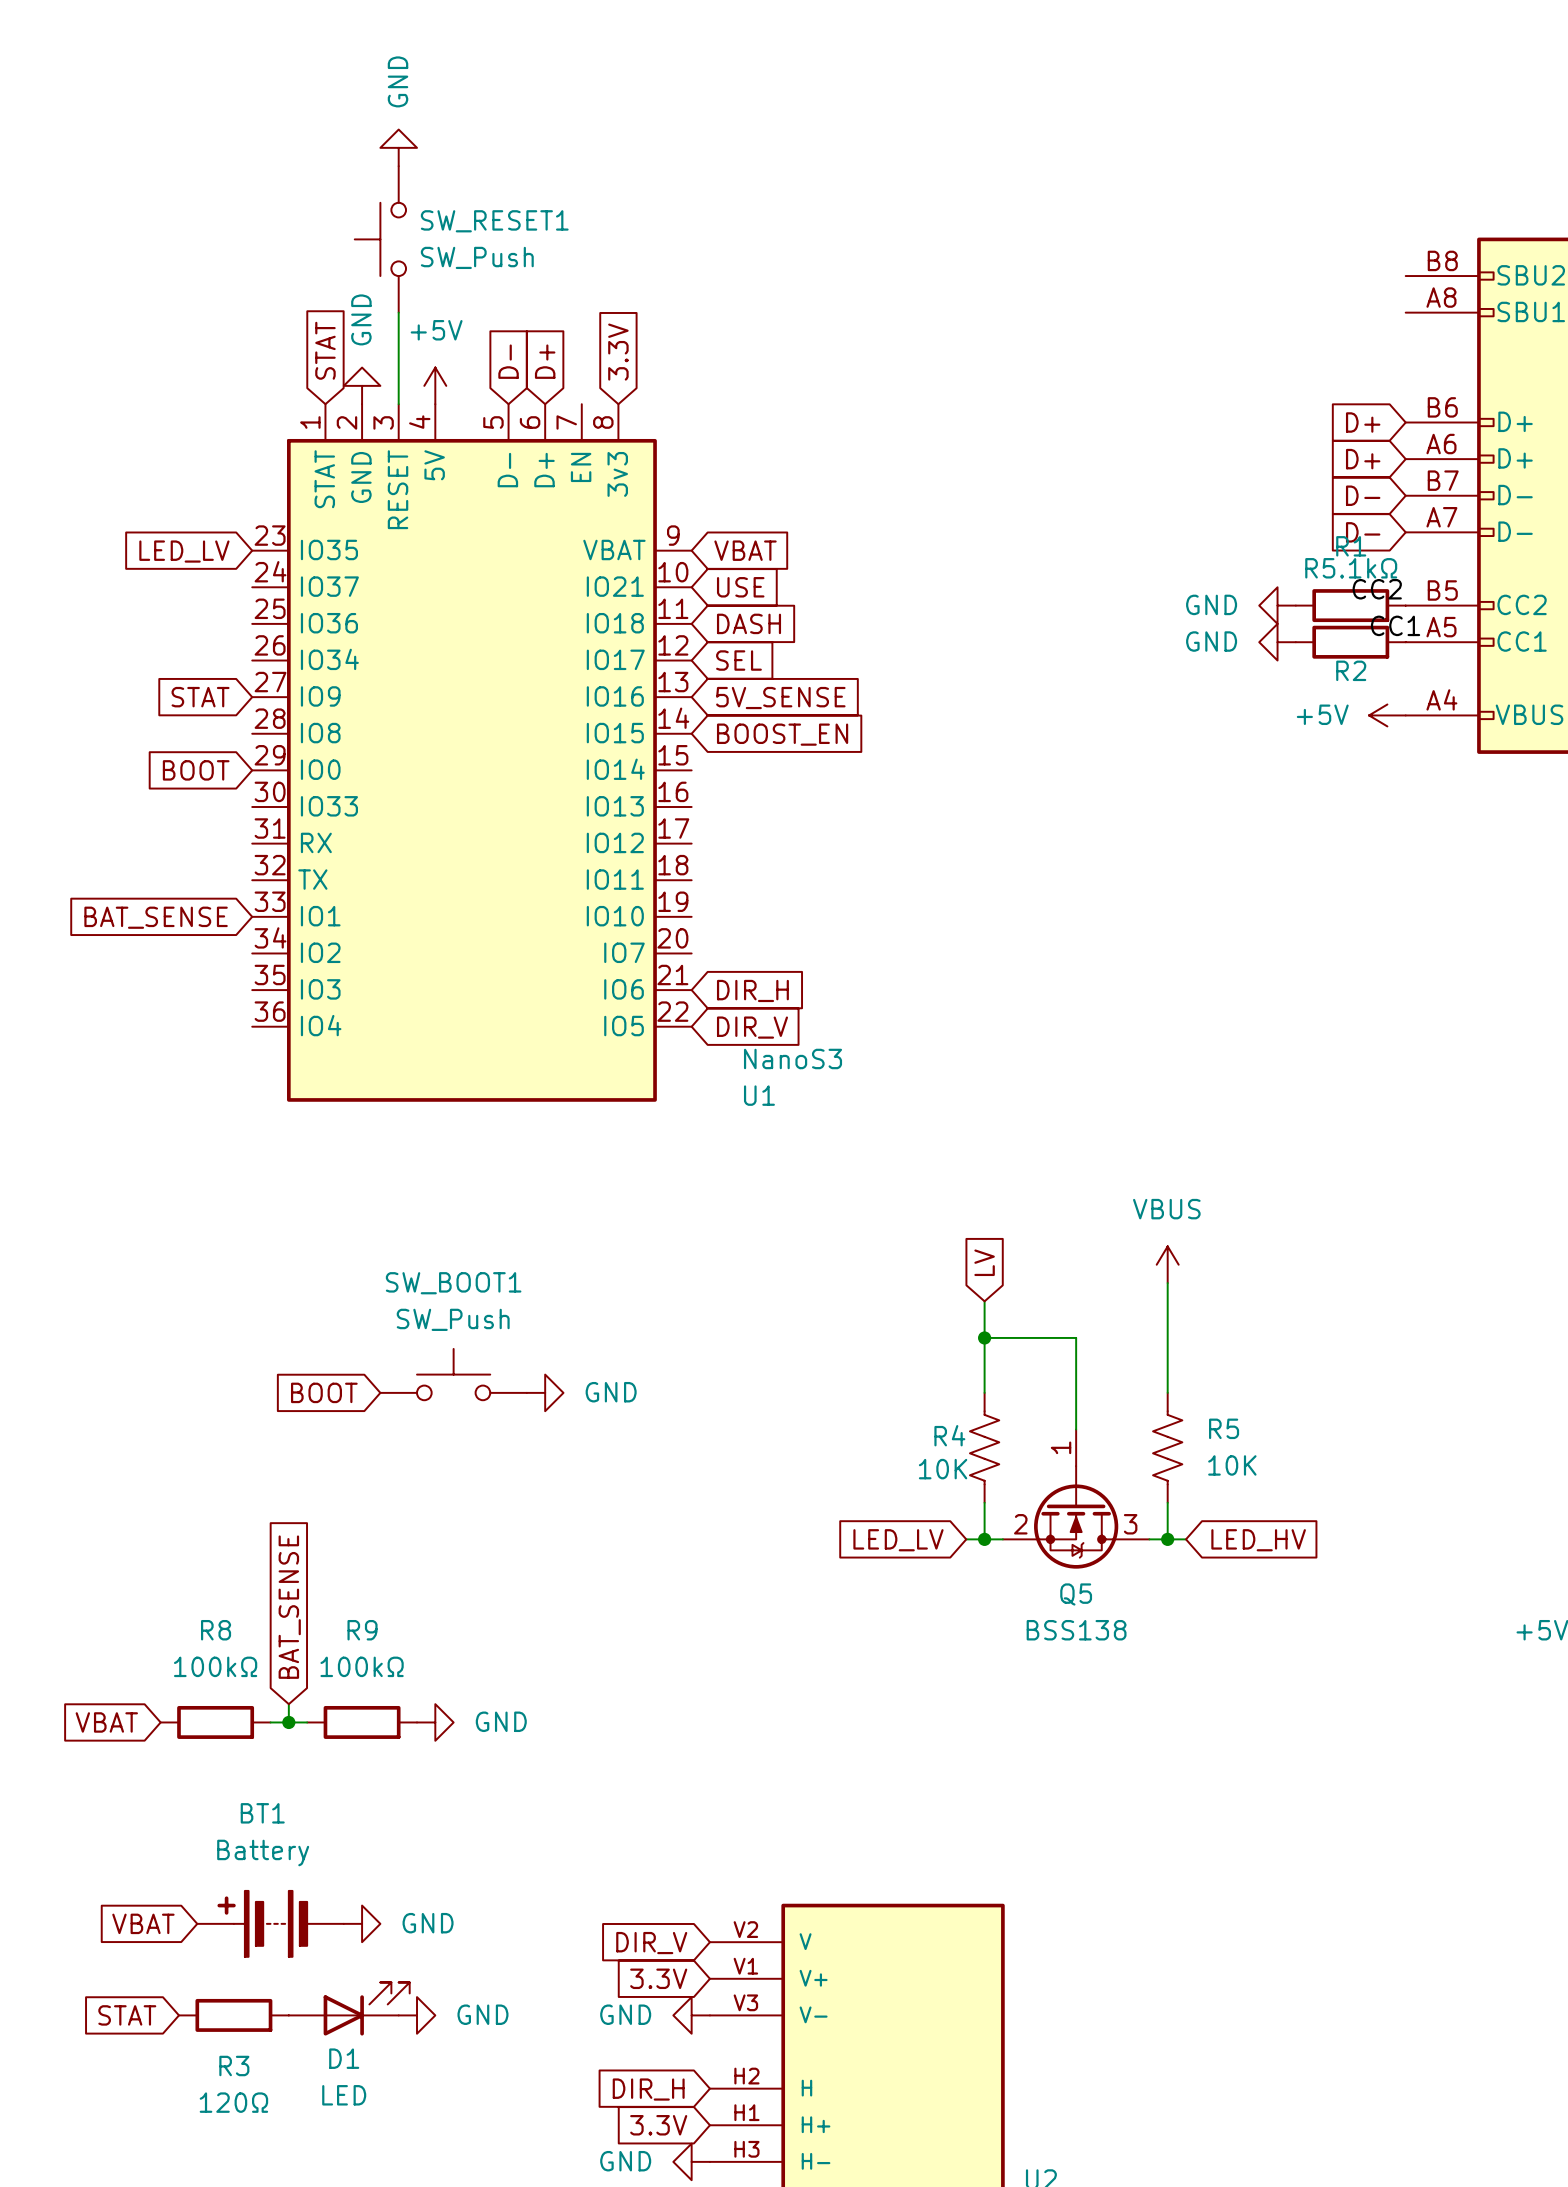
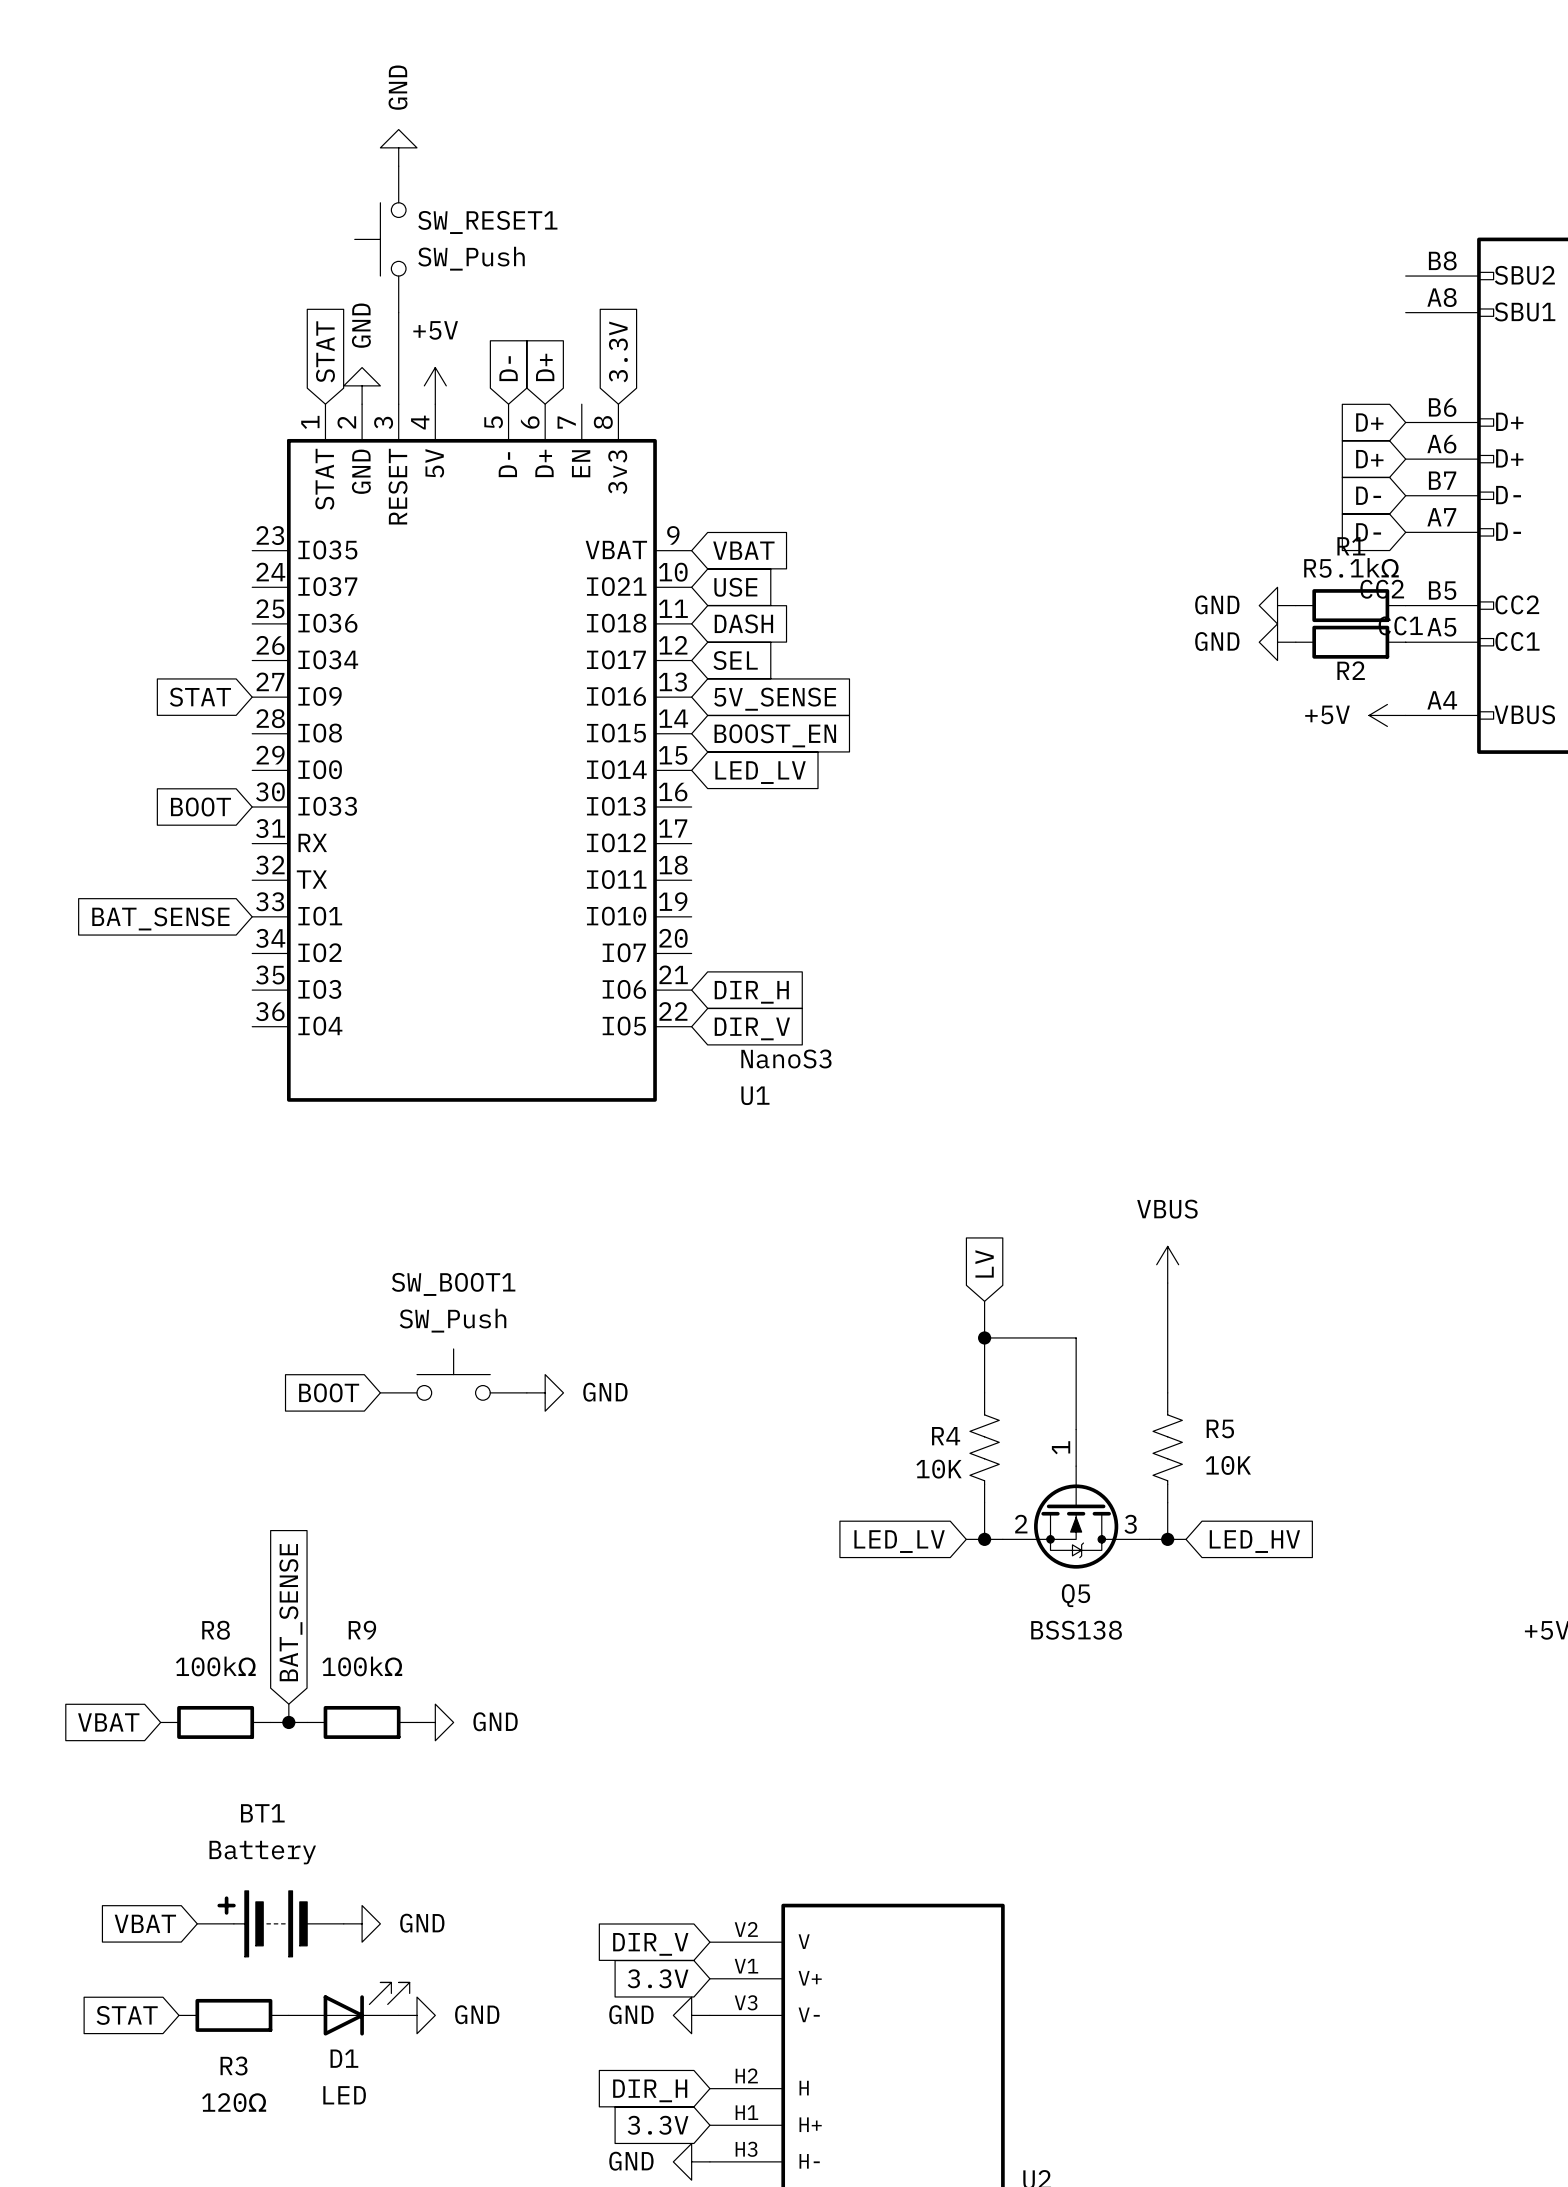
global label: LED_LV (184, 551) -> none
global label position: BOOT (196, 770) -> BOOT (200, 806)
global label: none -> LED_LV (760, 772)

